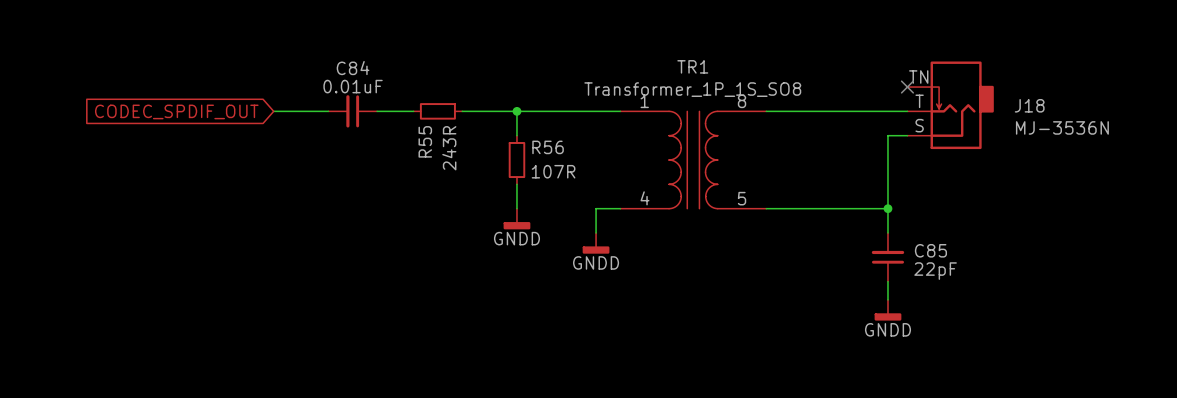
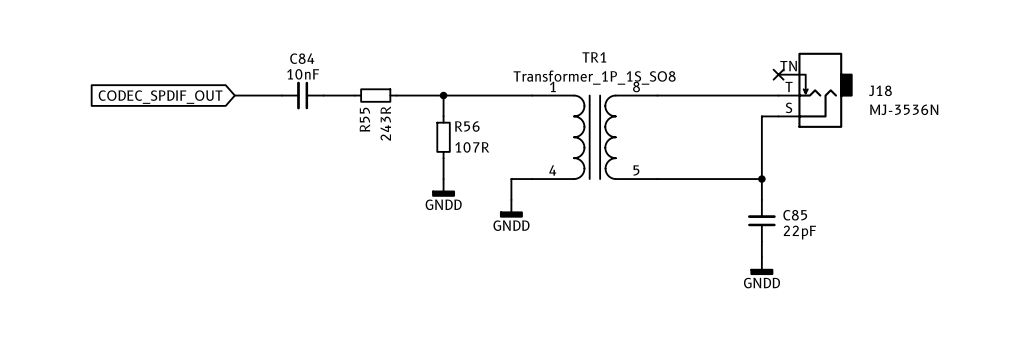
C84 value: 0.01uF (353, 86) -> 10nF (303, 74)

